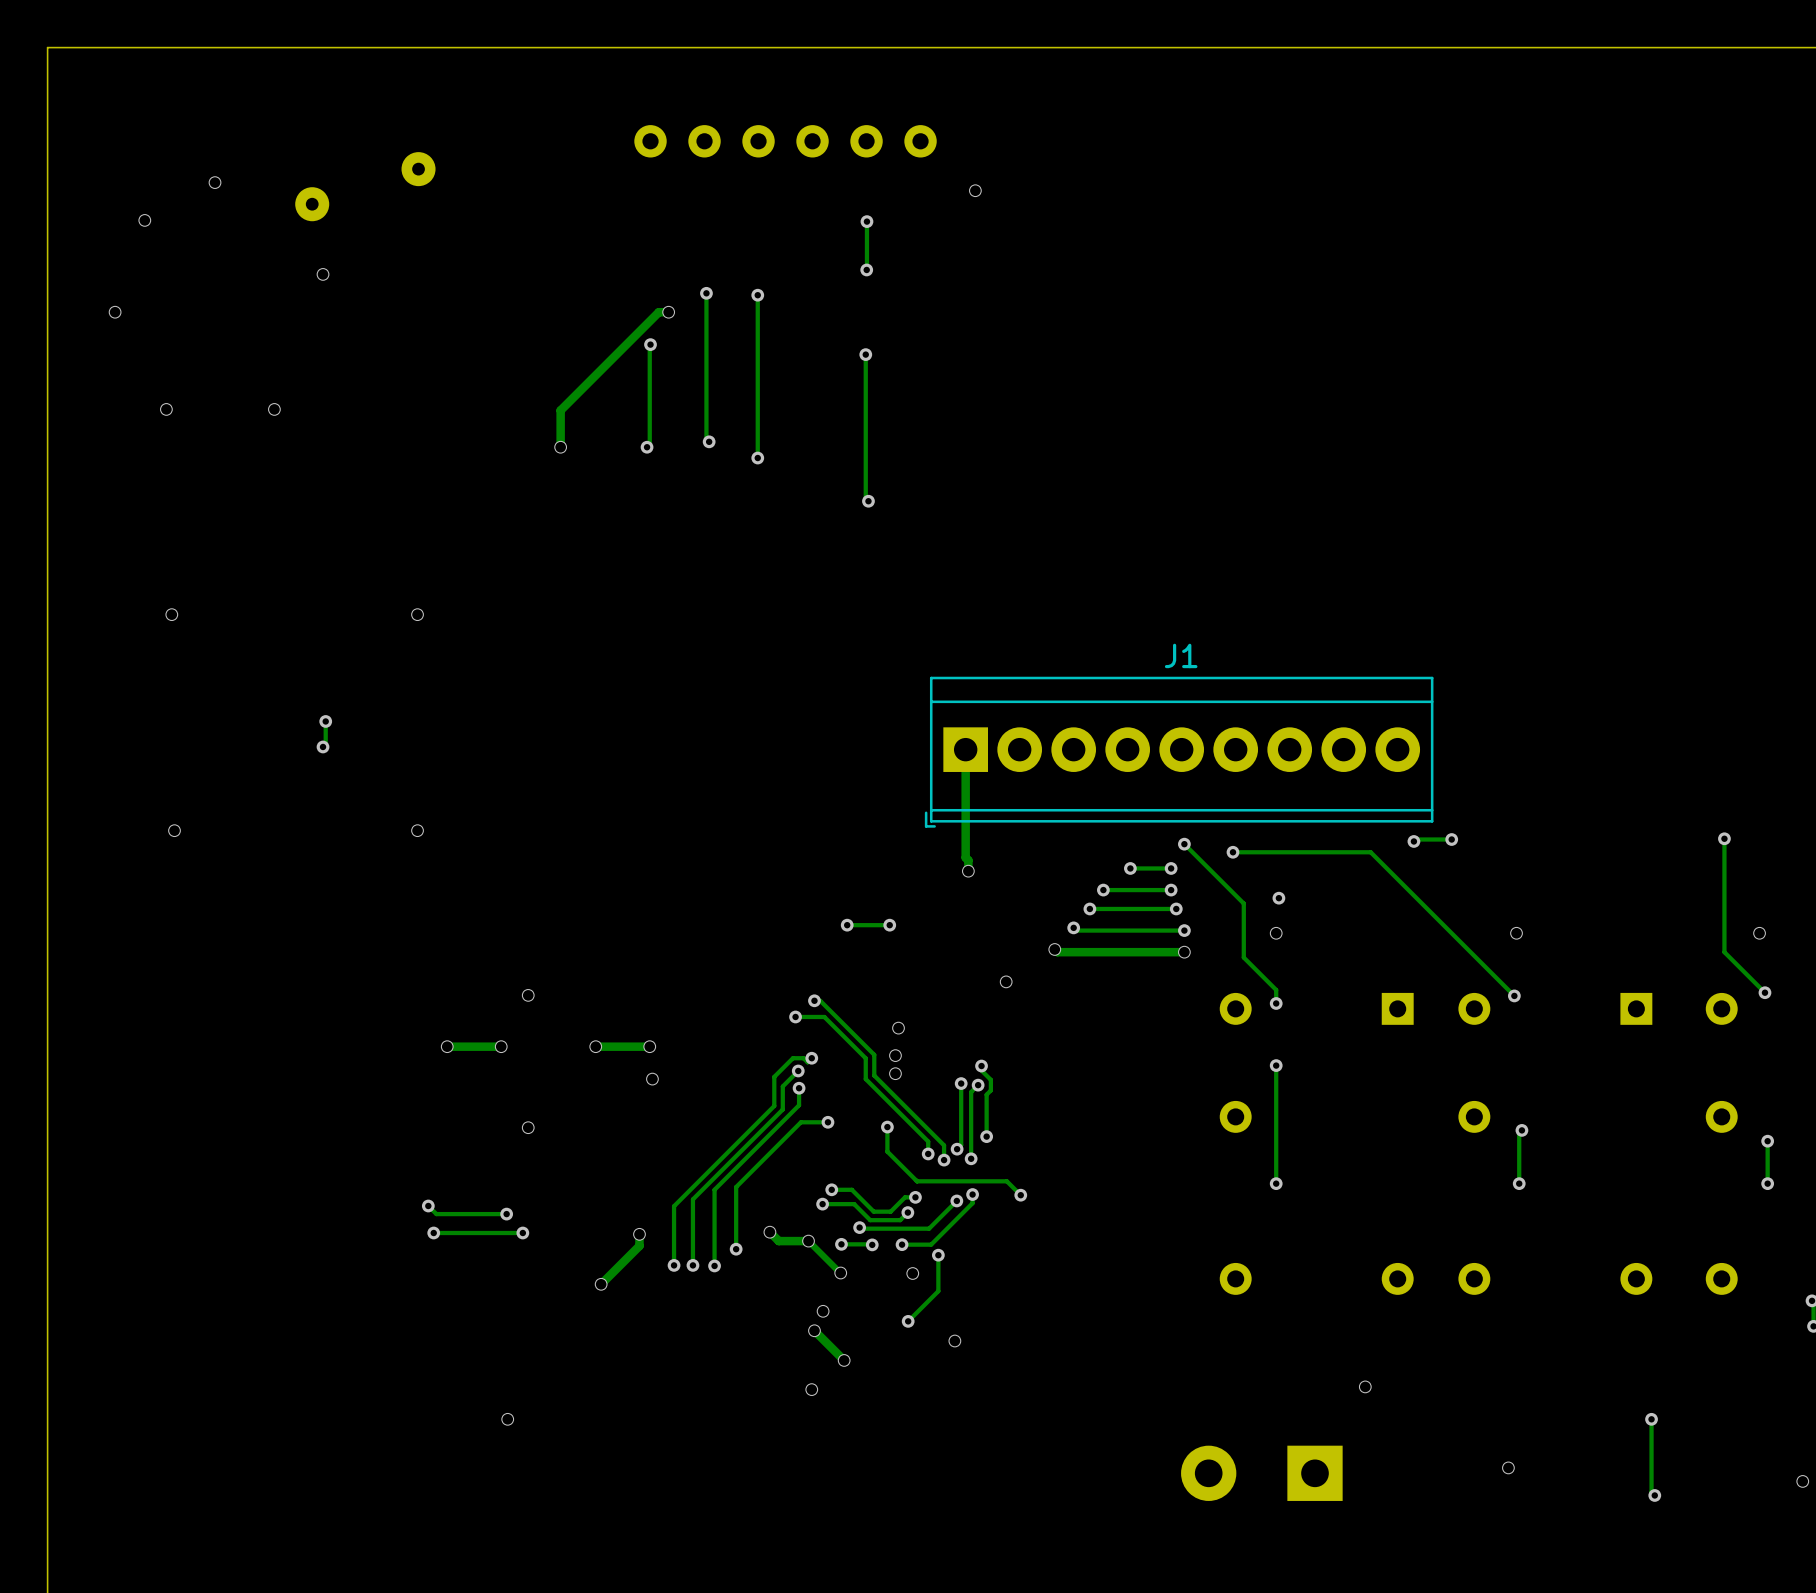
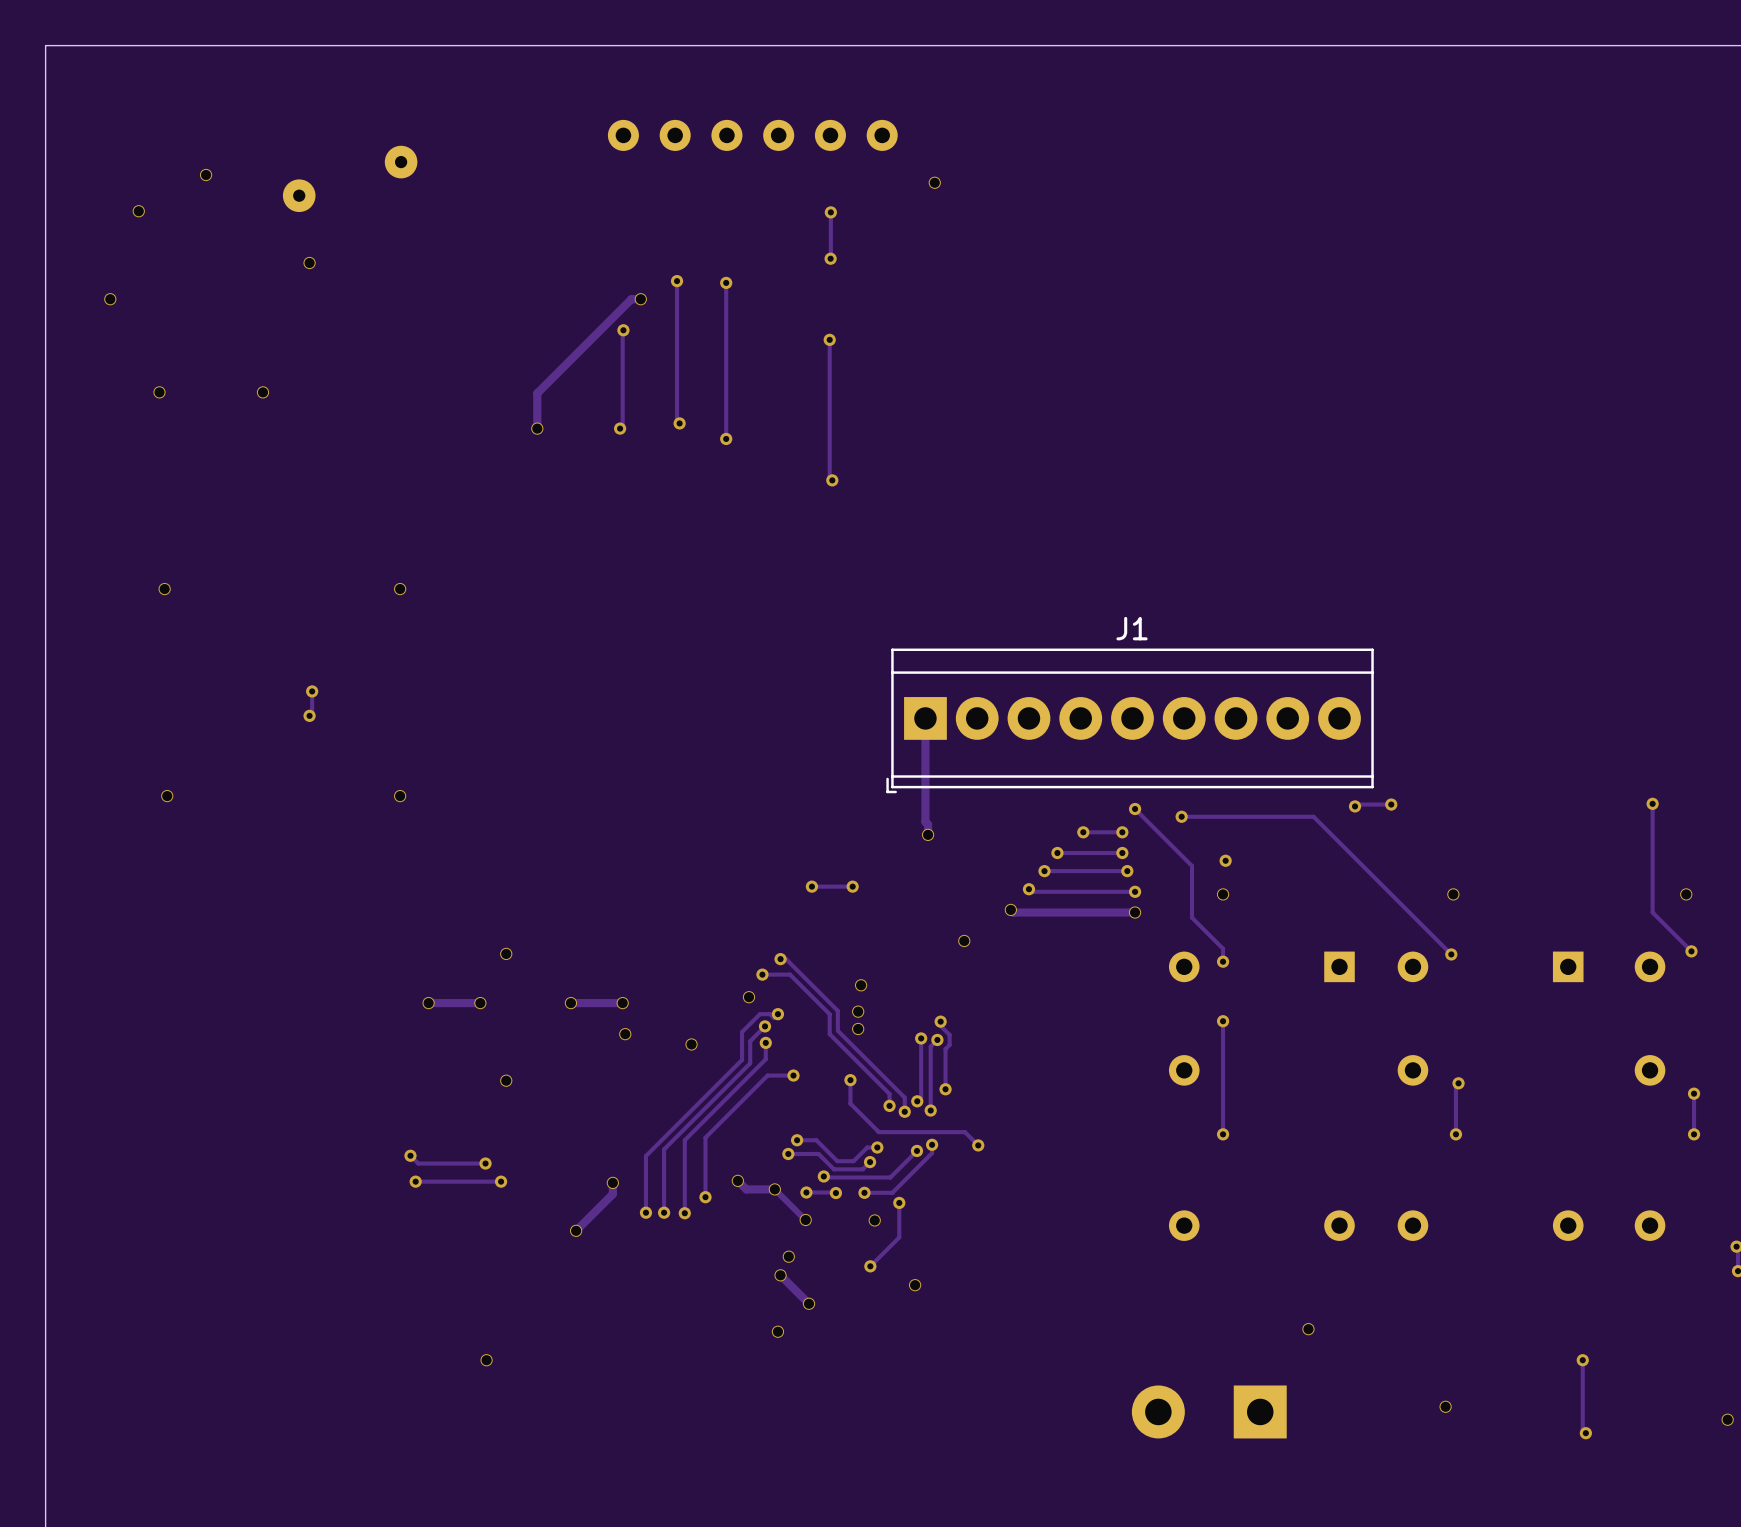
via: none -> (749, 997)
via: none -> (691, 1044)

